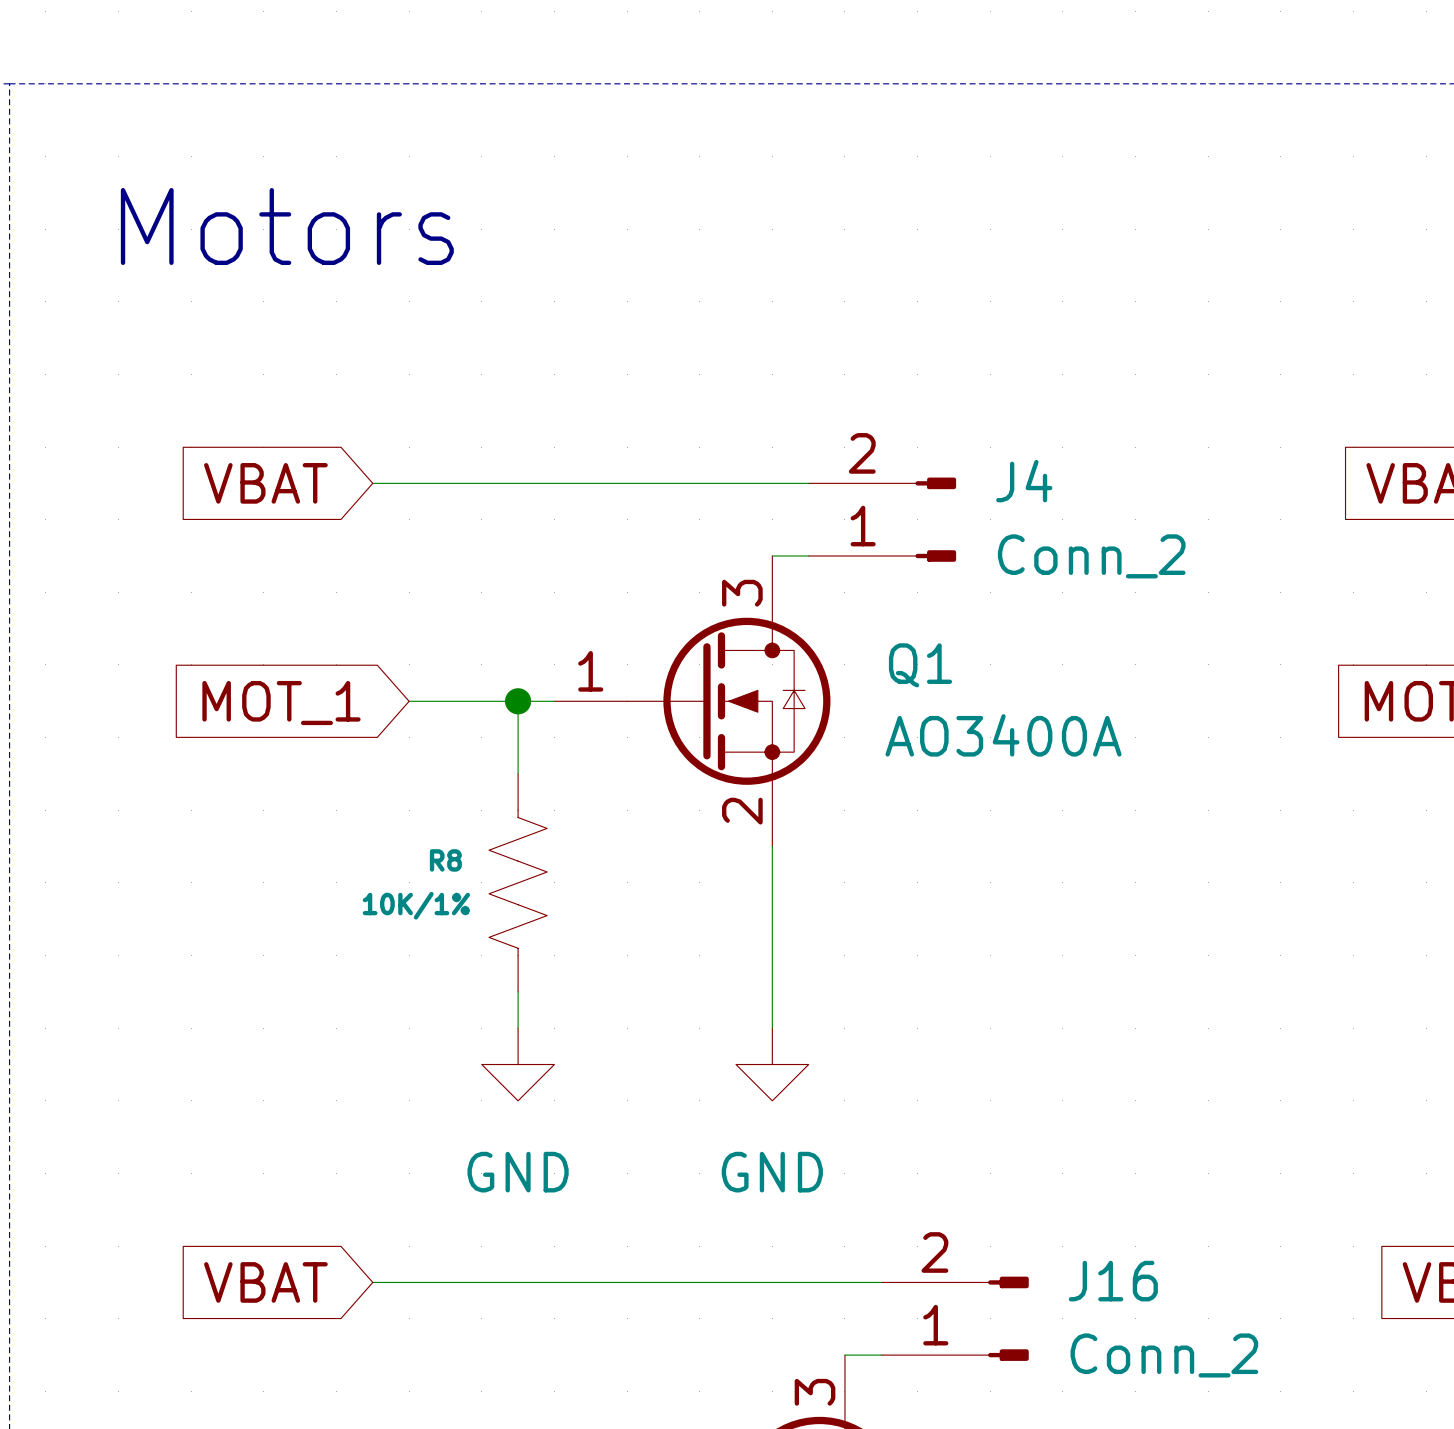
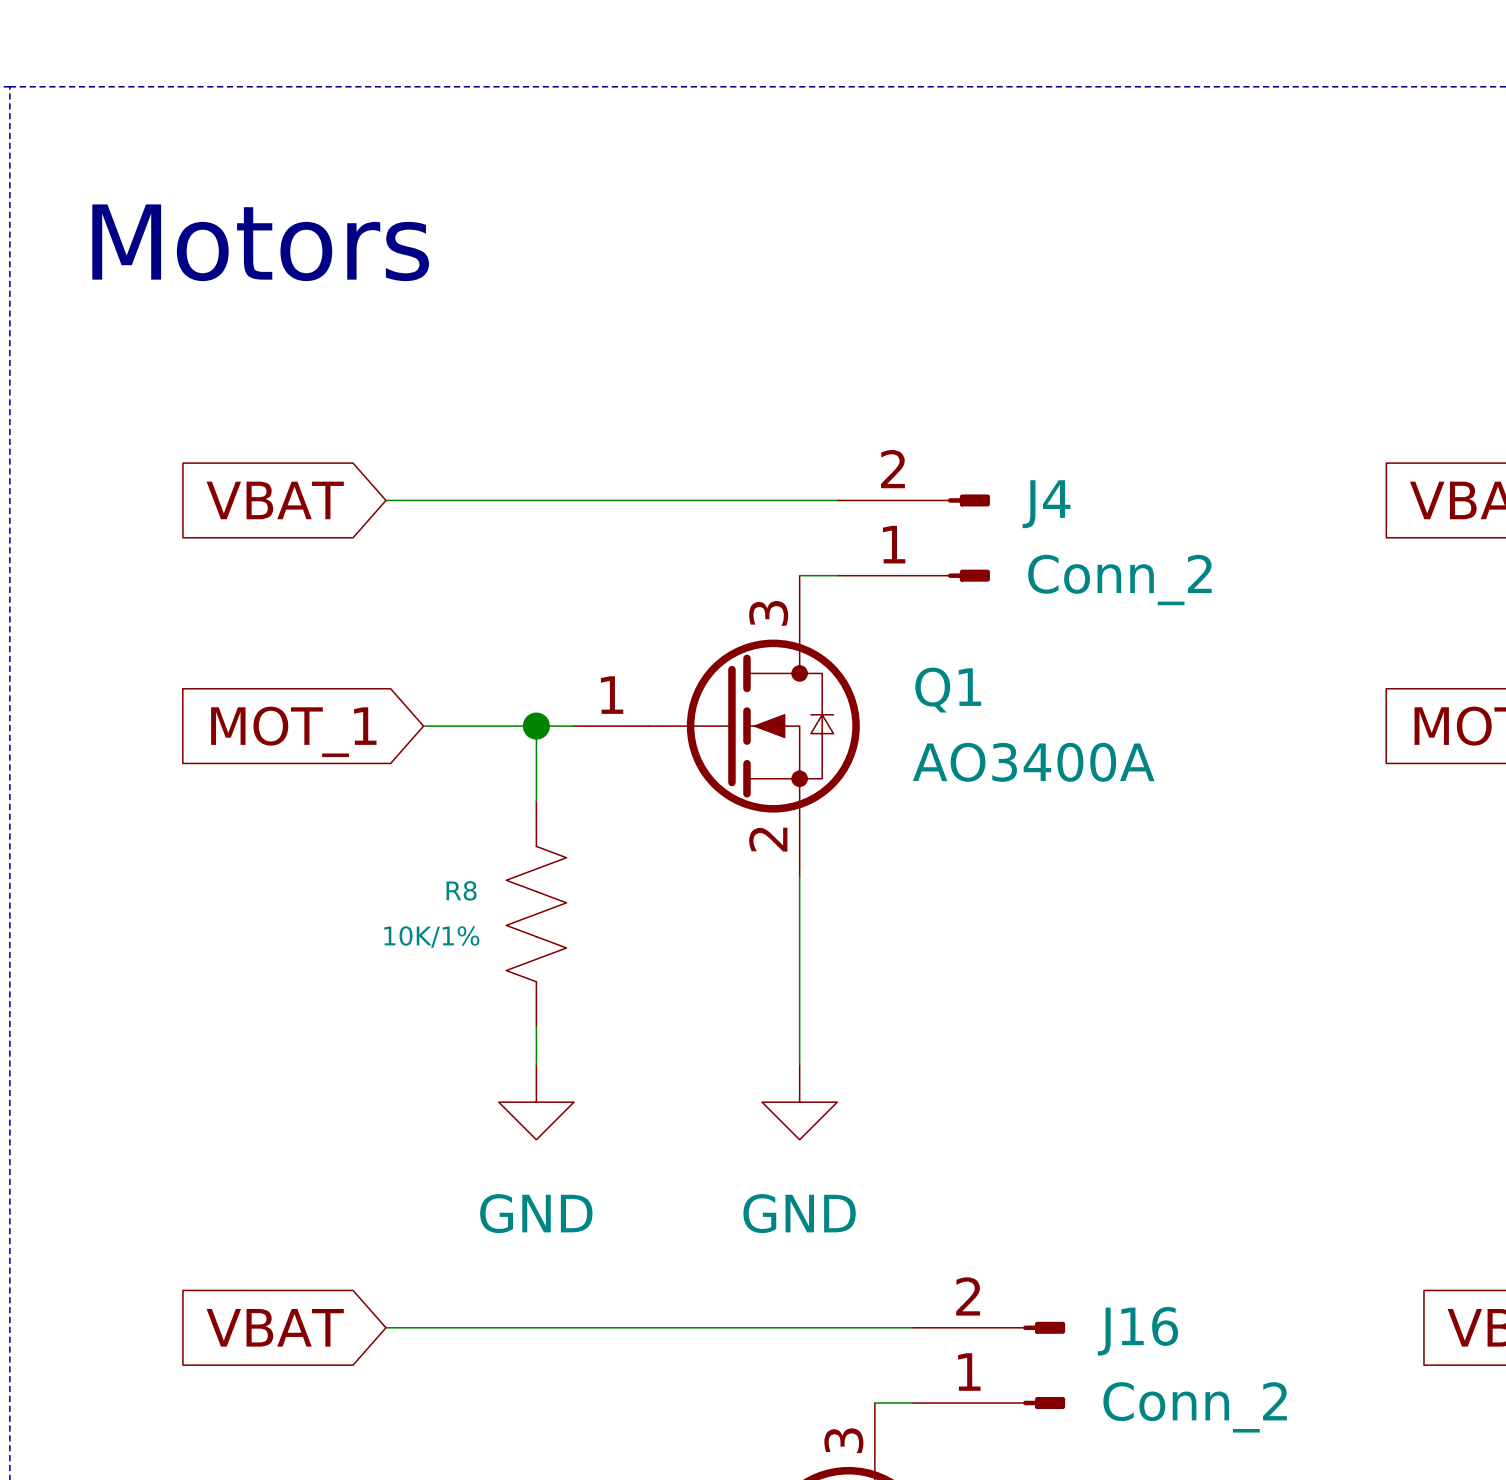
text position: Motors (287, 226) -> Motors (260, 242)

